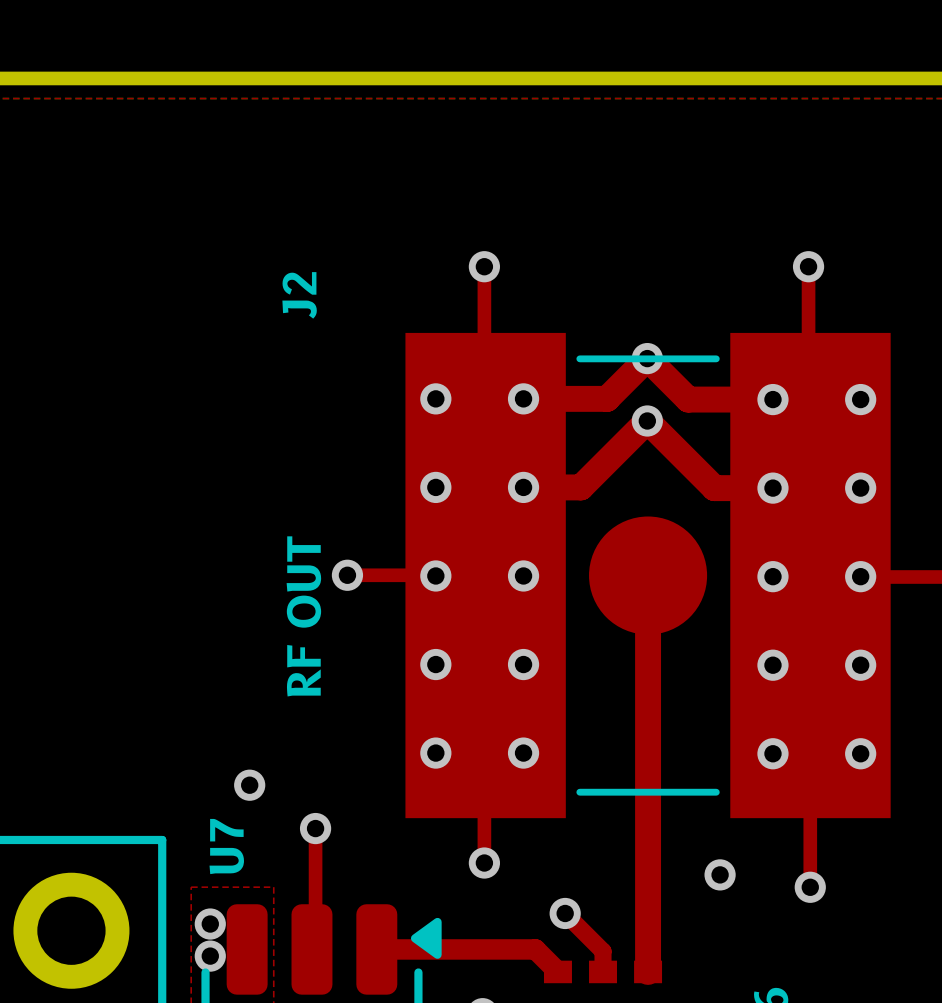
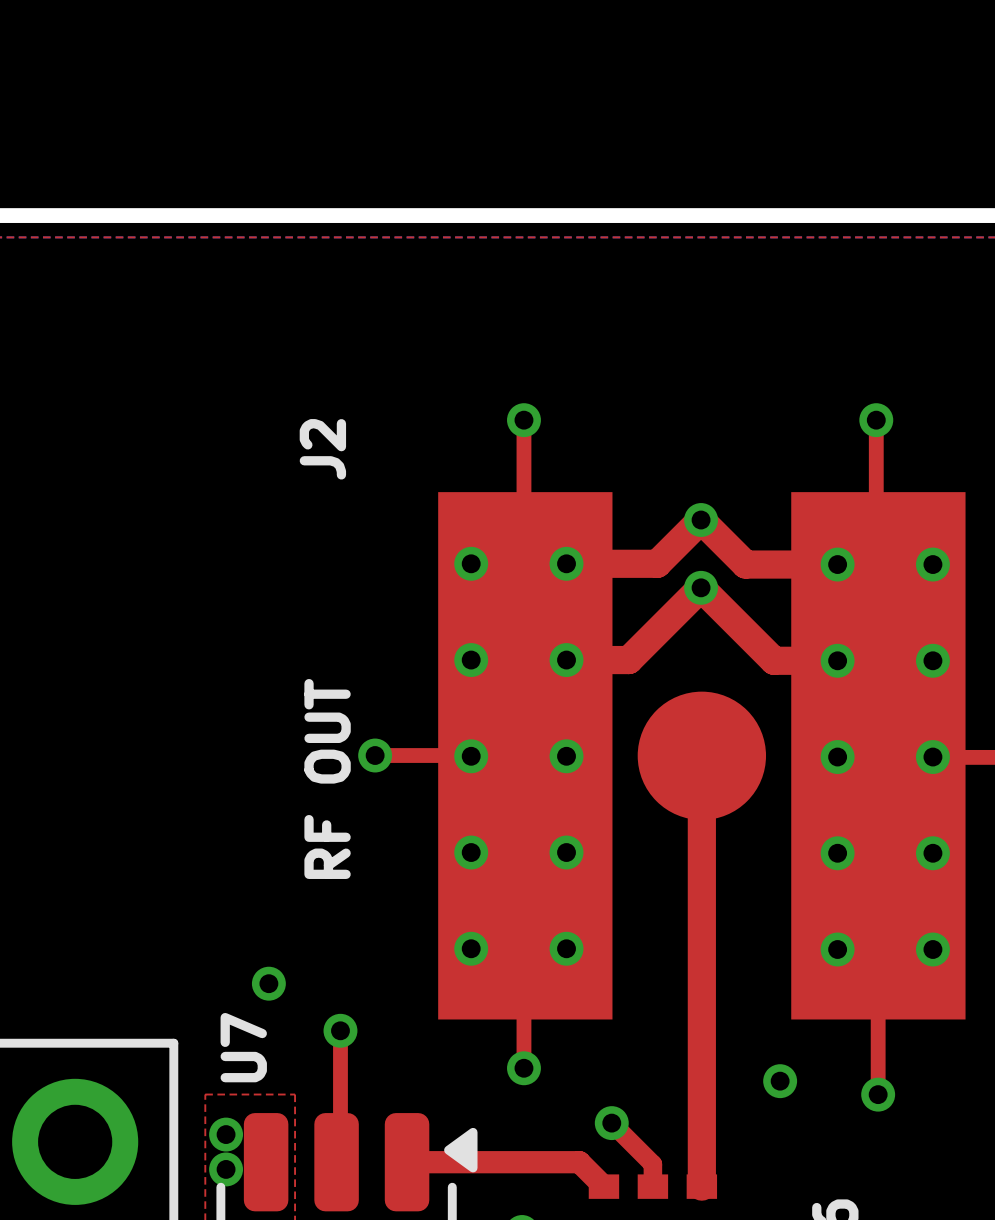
J2 footprint: [405, 332, 891, 819] -> [438, 492, 966, 1020]

